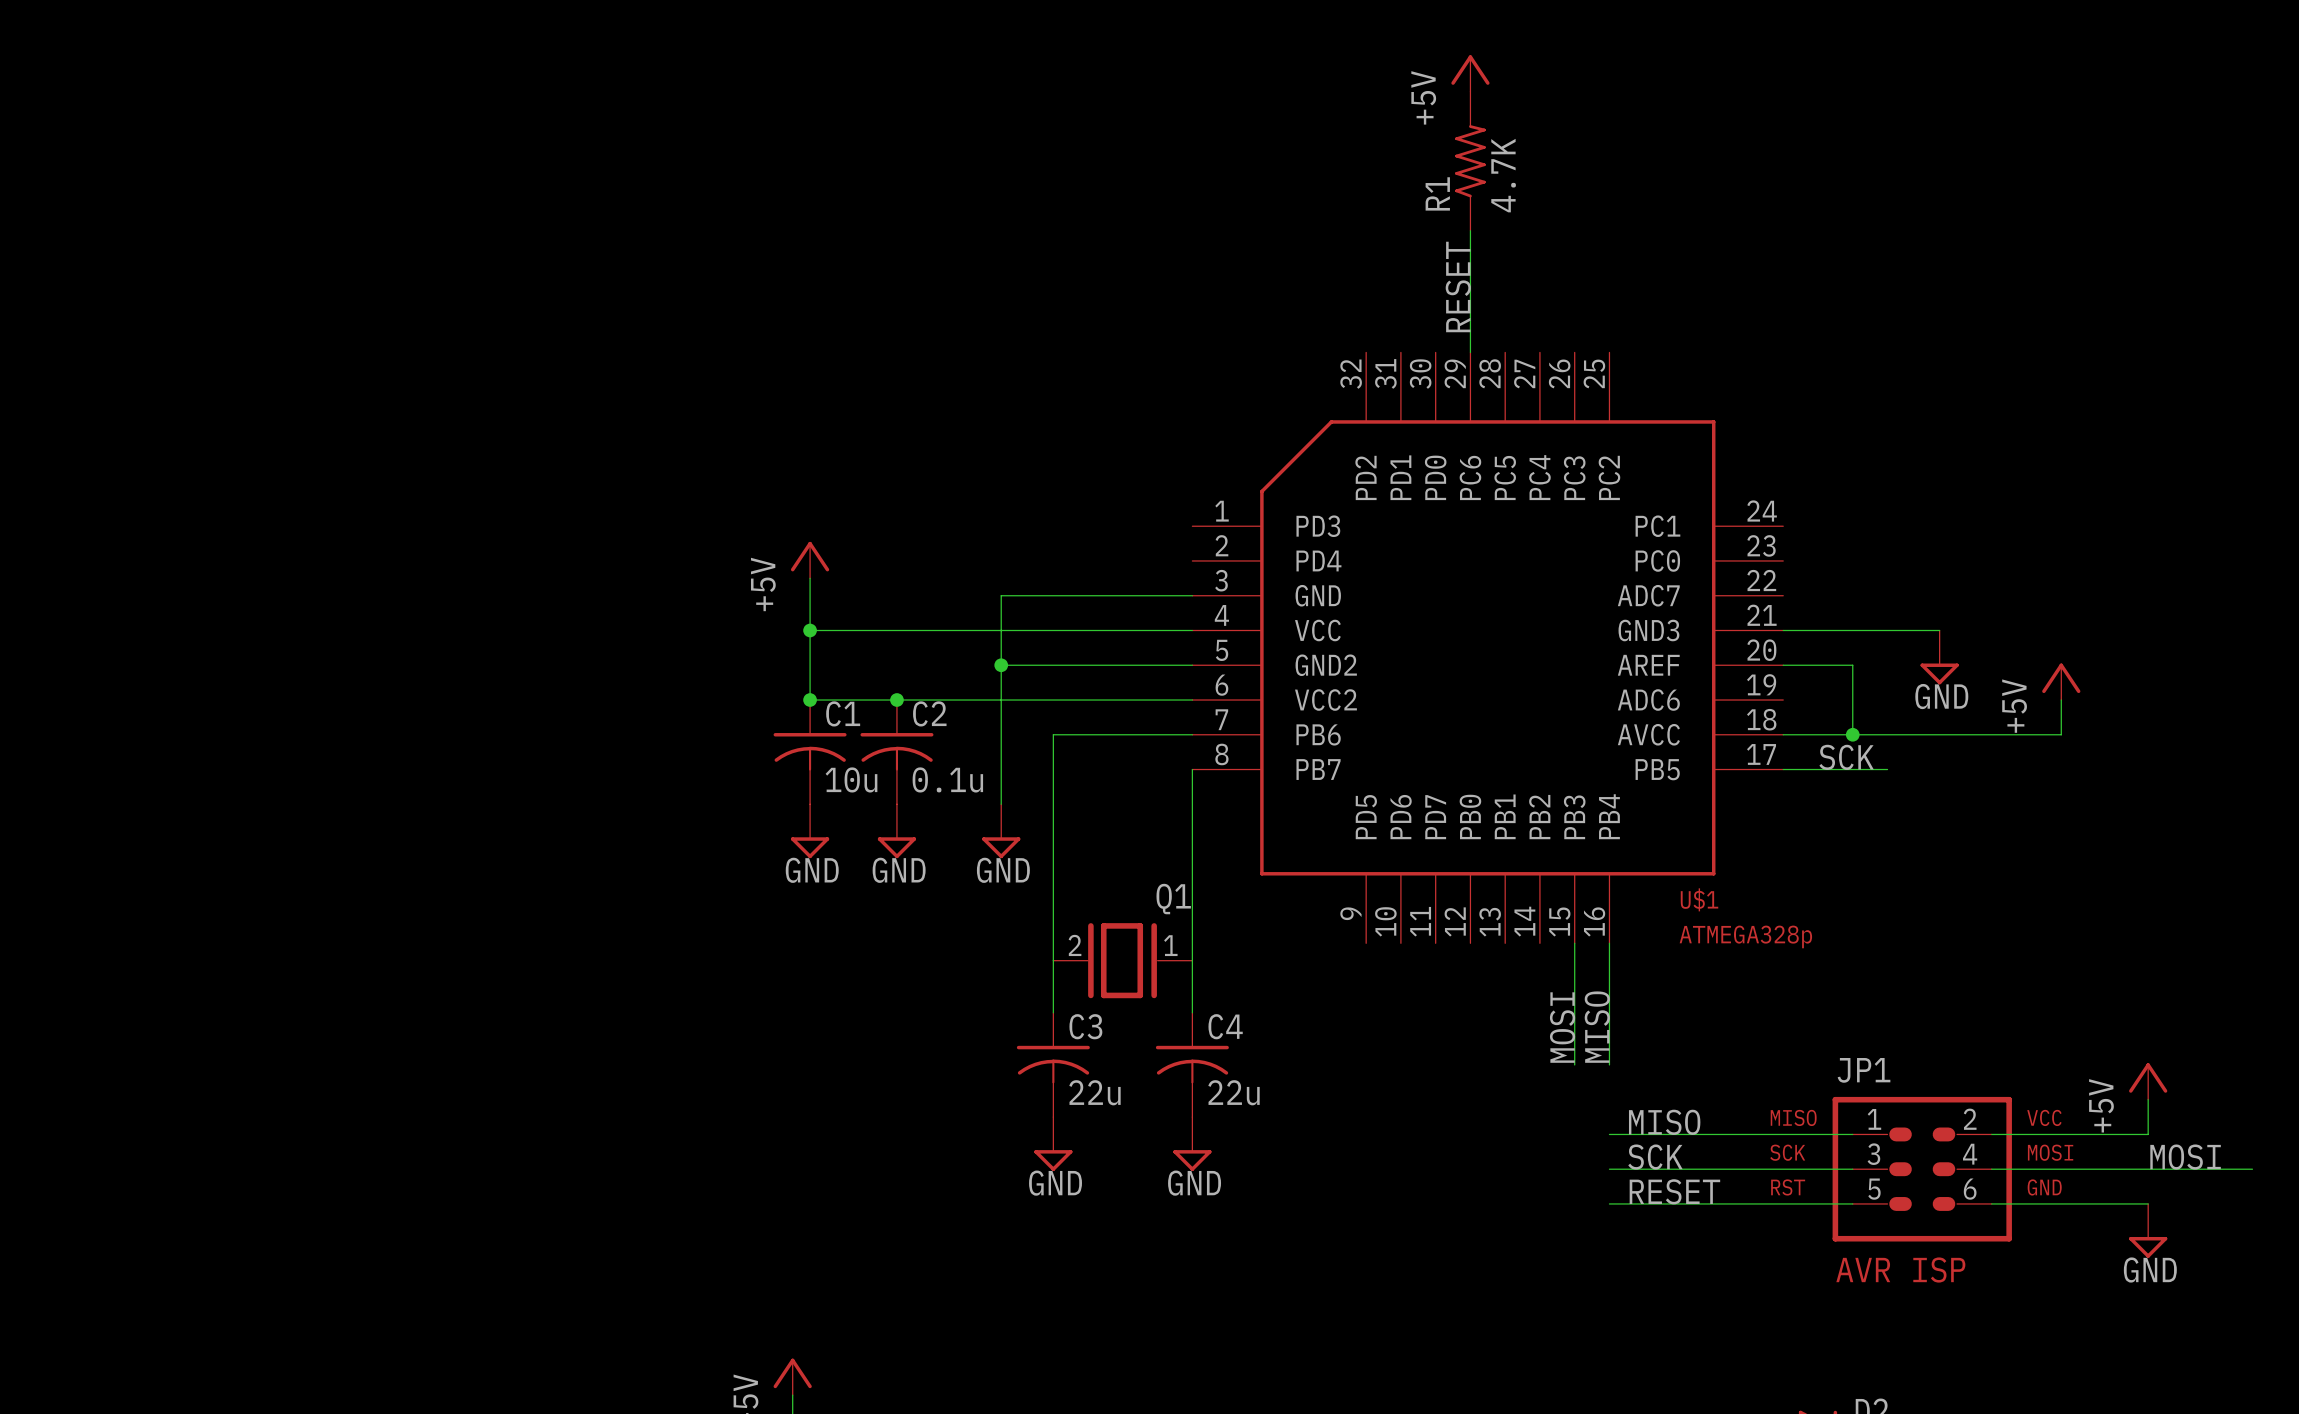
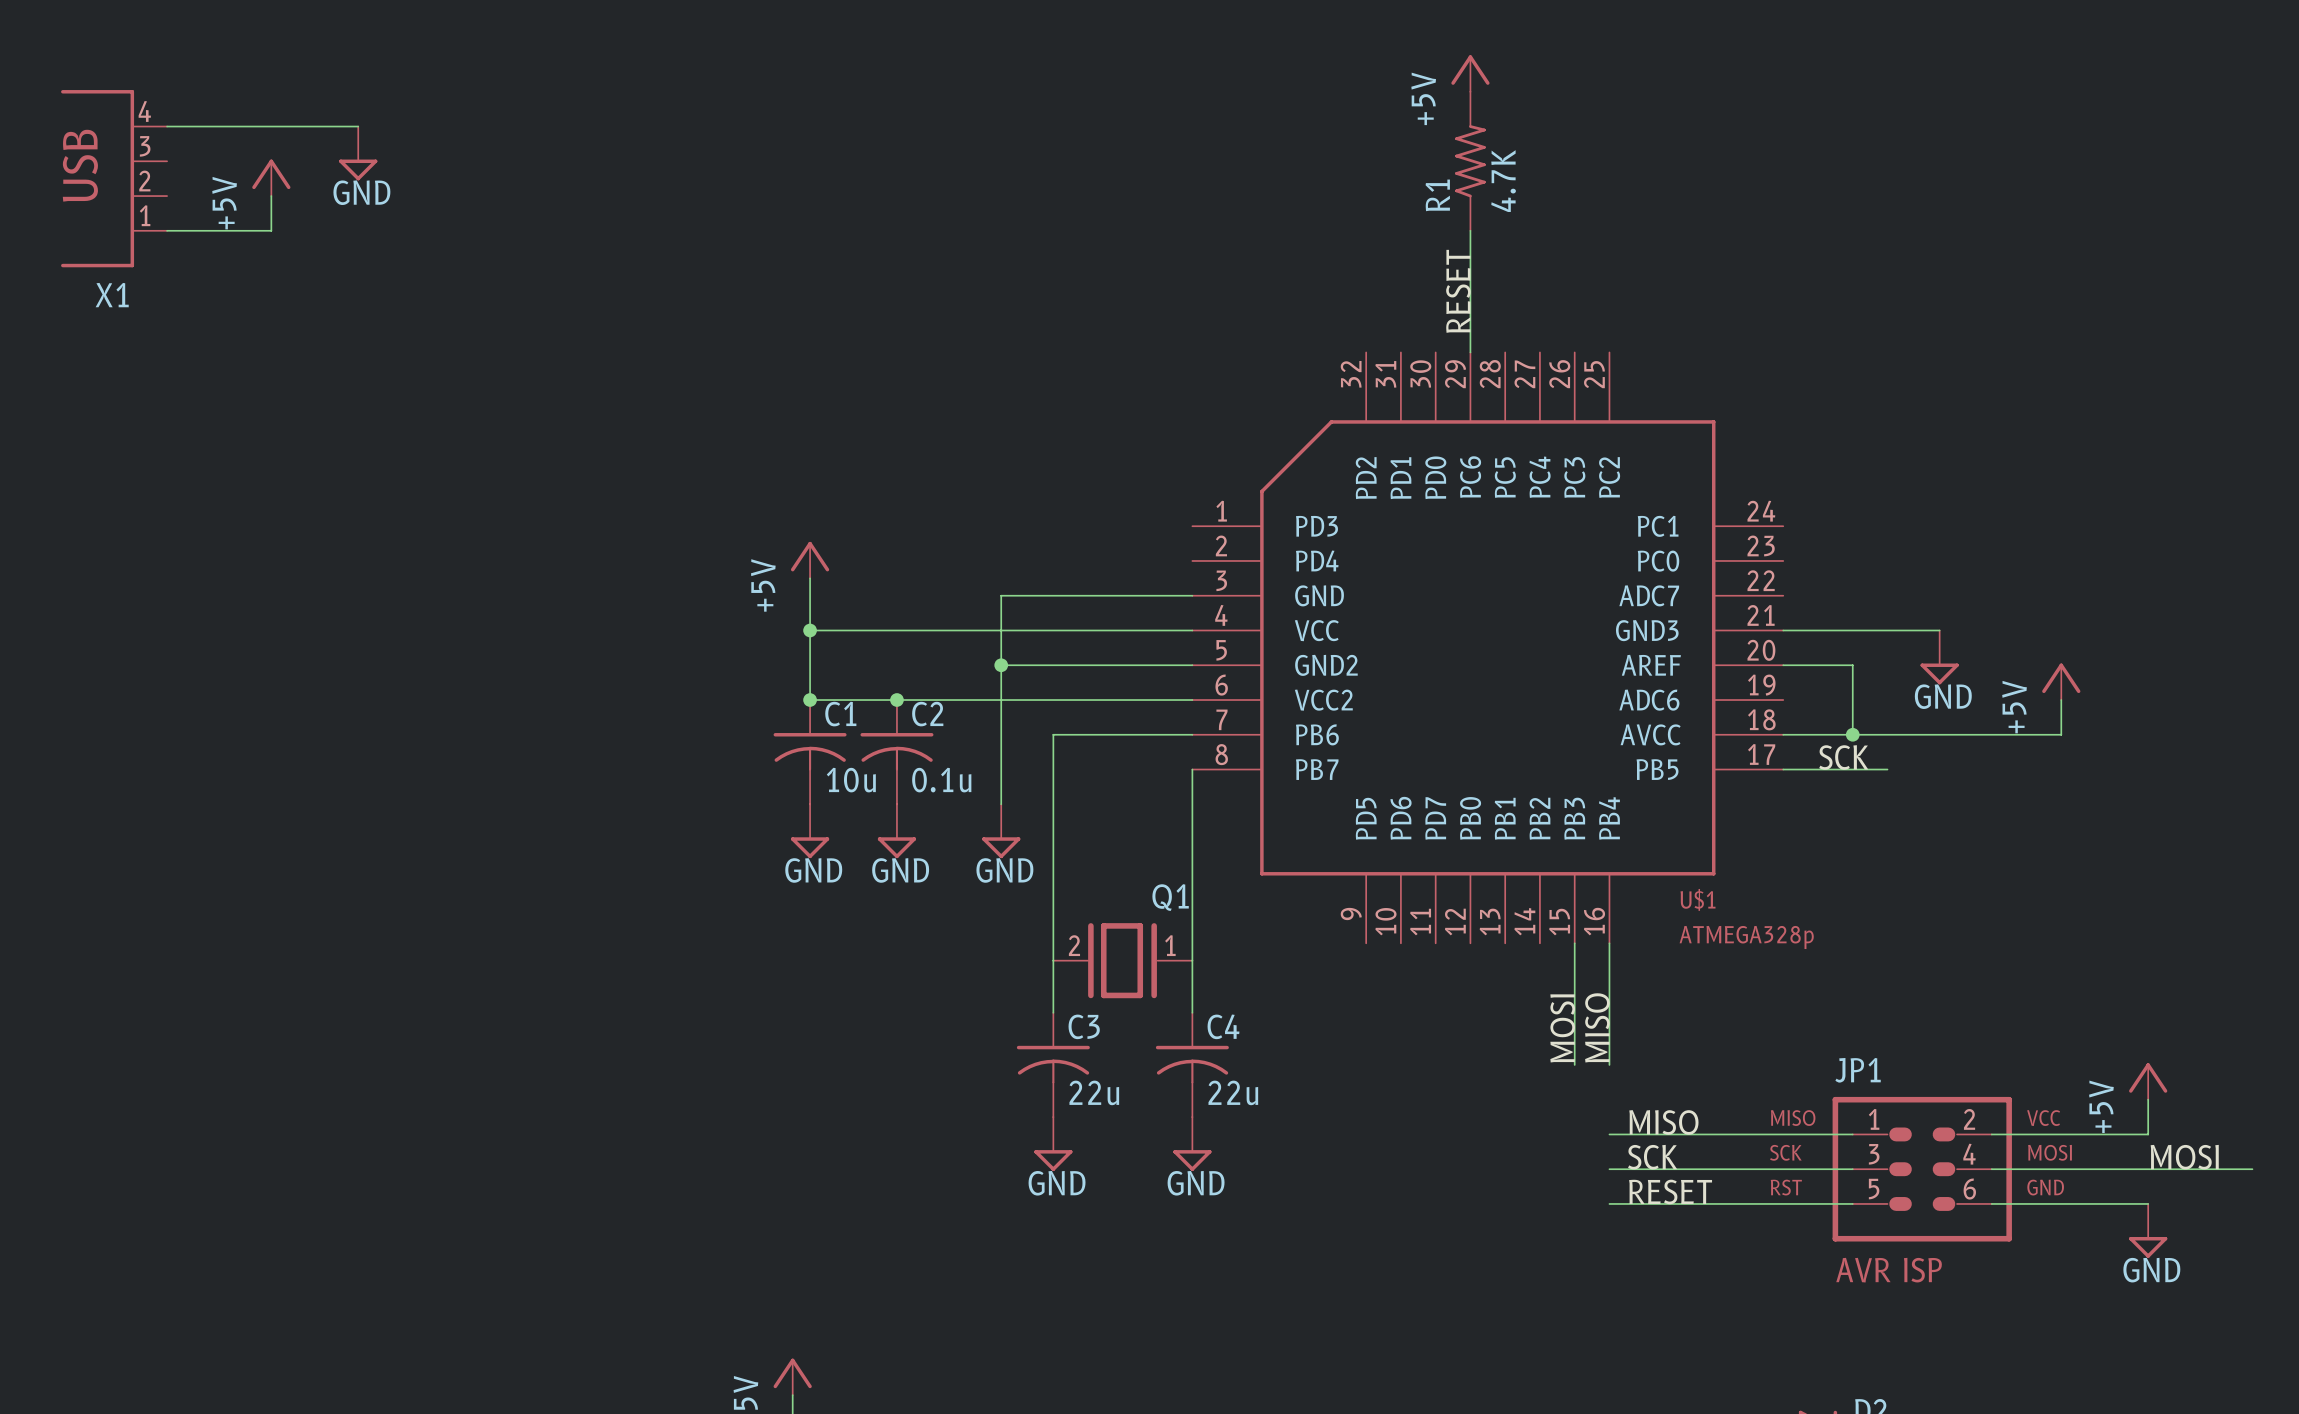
wire: none -> (167, 126) (358, 126)
power symbol: none -> GND (358, 153)
power symbol: none -> +5V (271, 177)
X1: none -> (114, 178)
wire: none -> (271, 196) (271, 230) (167, 230)

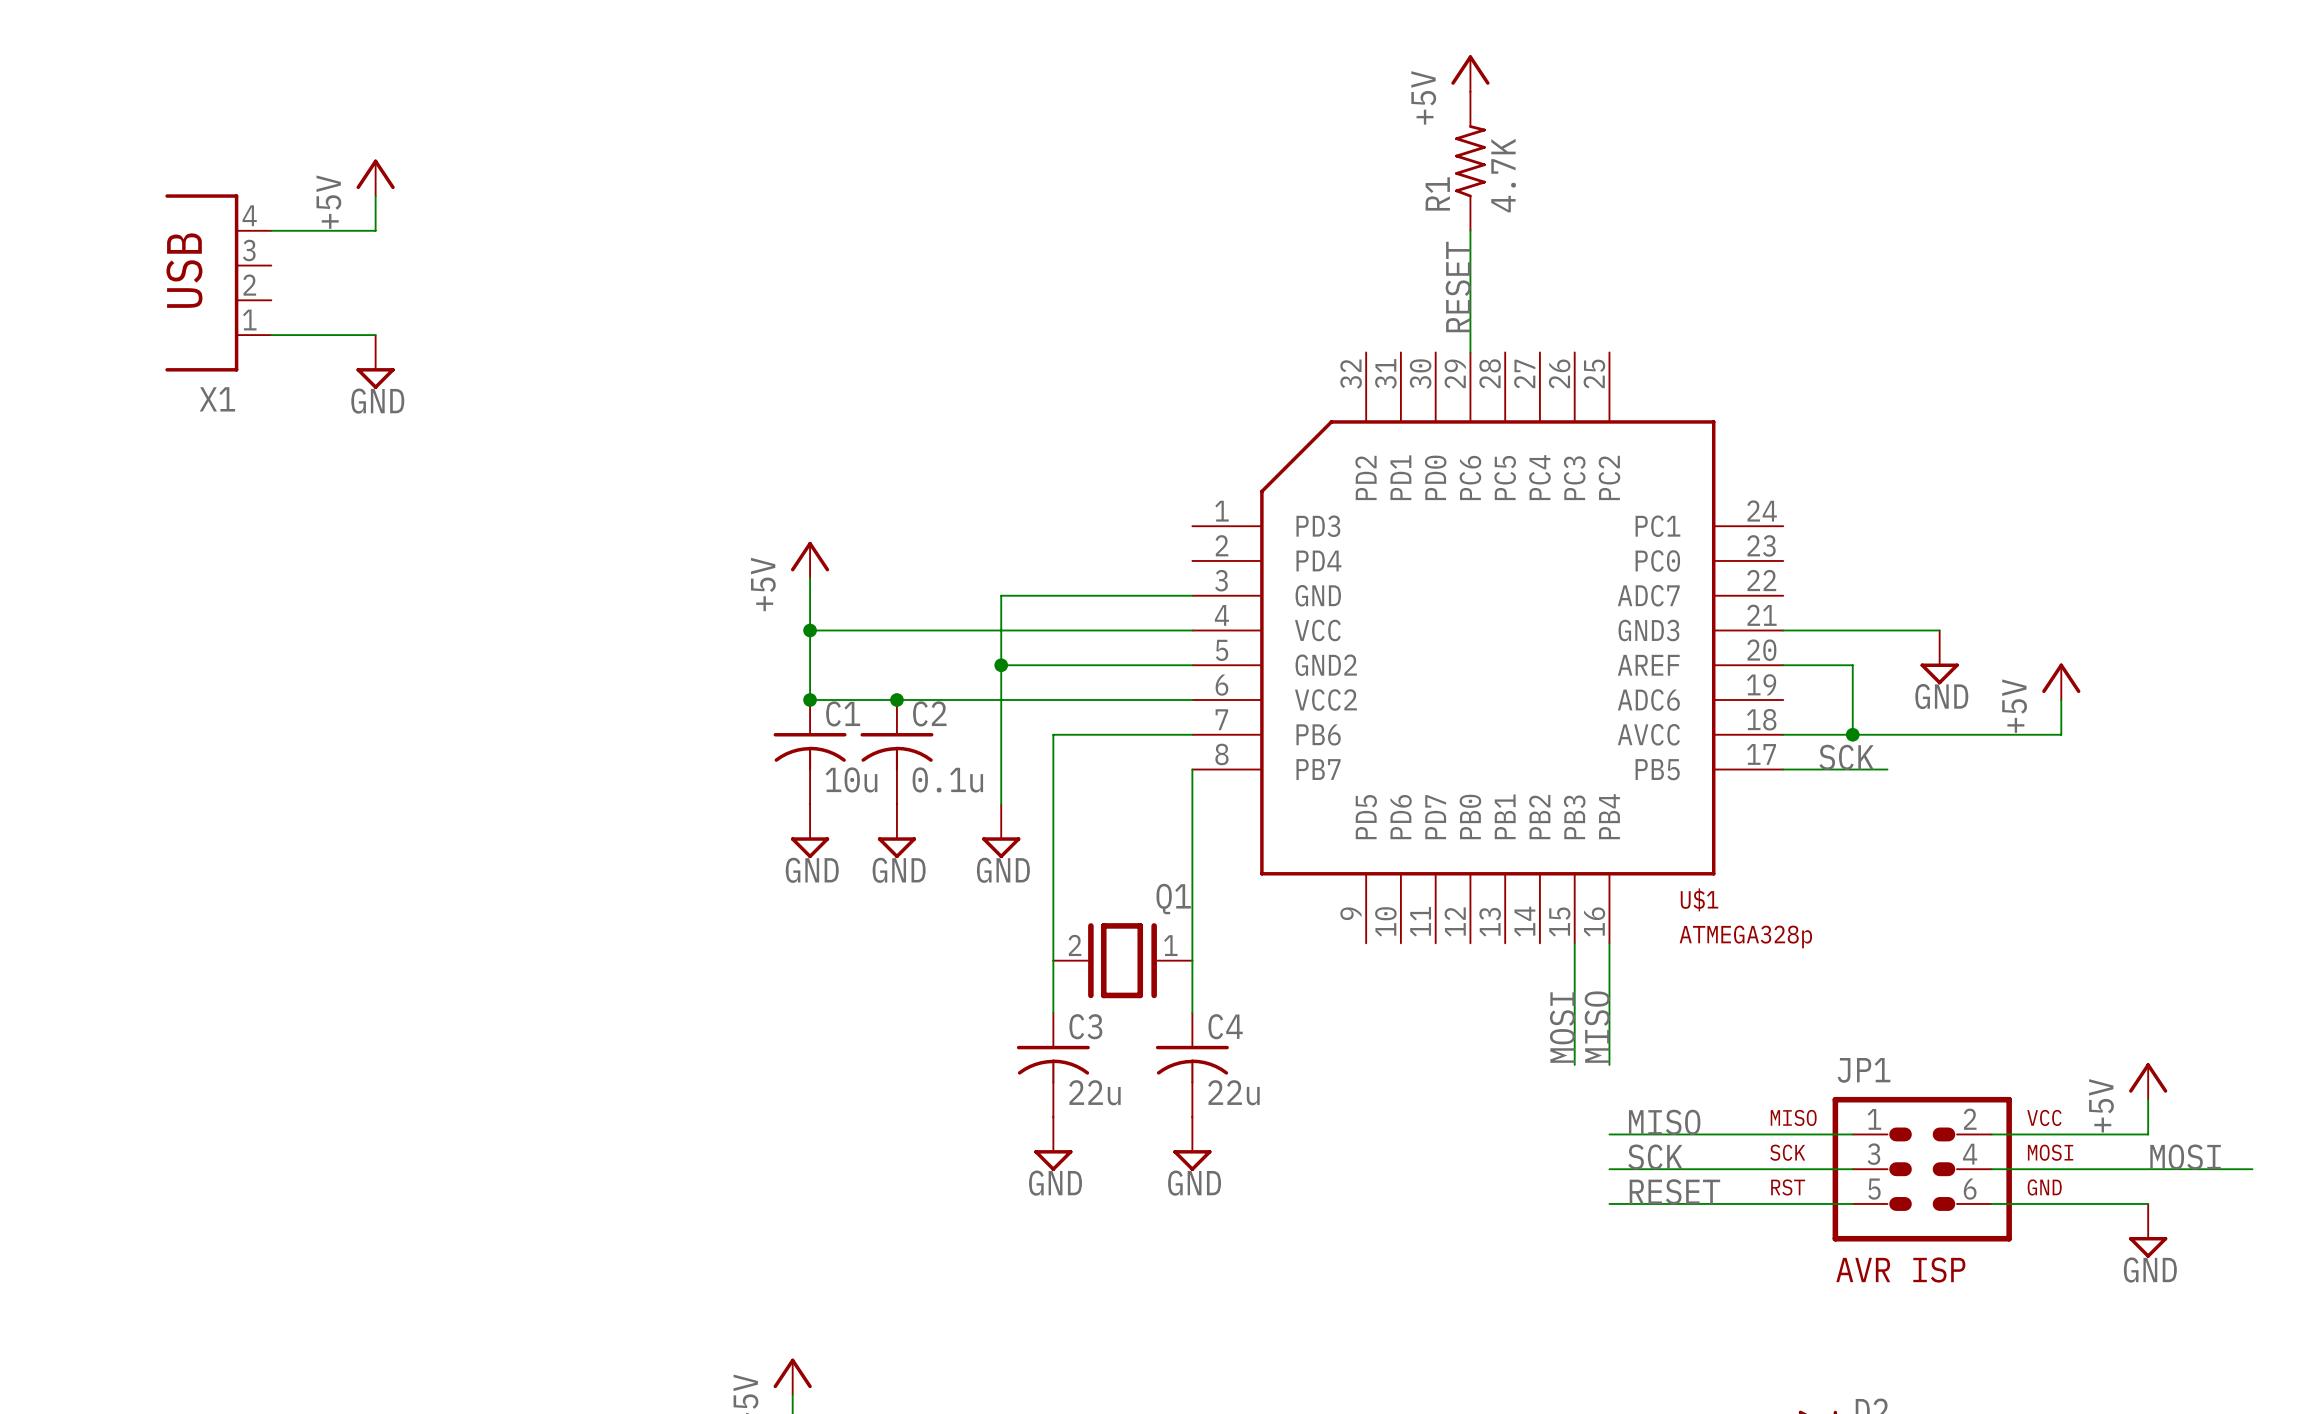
wire: (167, 126) (358, 126) -> none
power symbol position: GND (358, 153) -> GND (375, 362)
power symbol position: +5V (271, 177) -> +5V (375, 177)
X1 position: (114, 178) -> (218, 282)
wire: (271, 196) (271, 230) (167, 230) -> (375, 196) (375, 230) (271, 230)
wire: none -> (271, 335) (375, 335)

